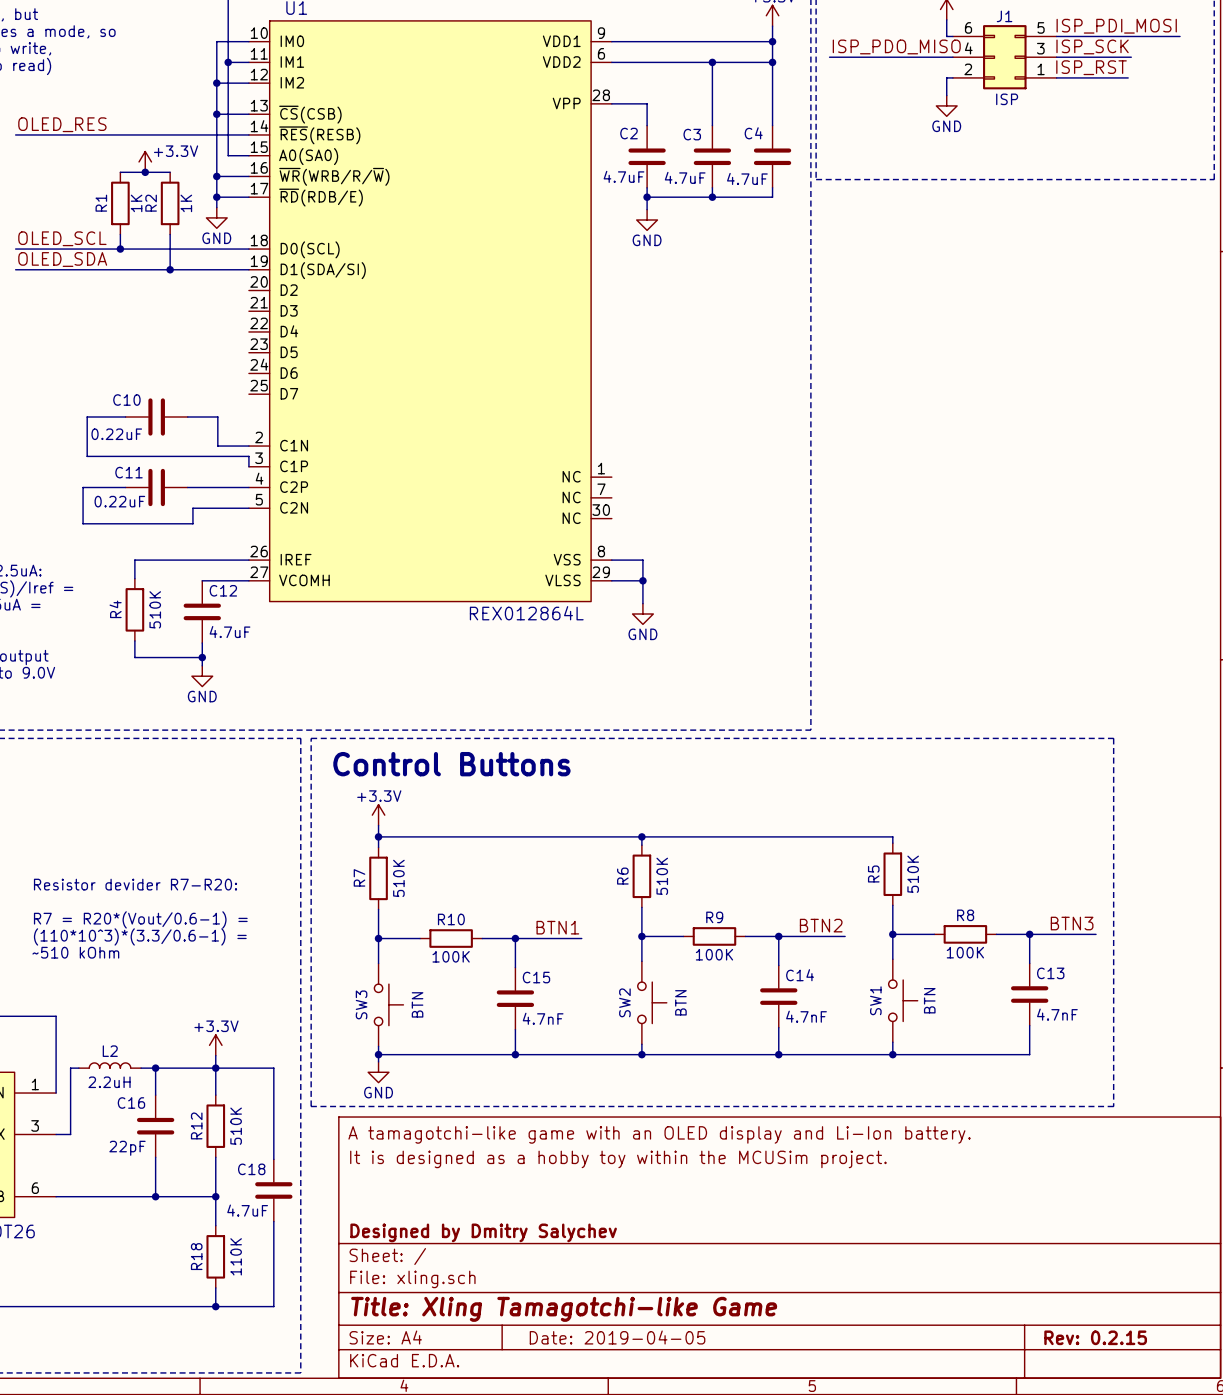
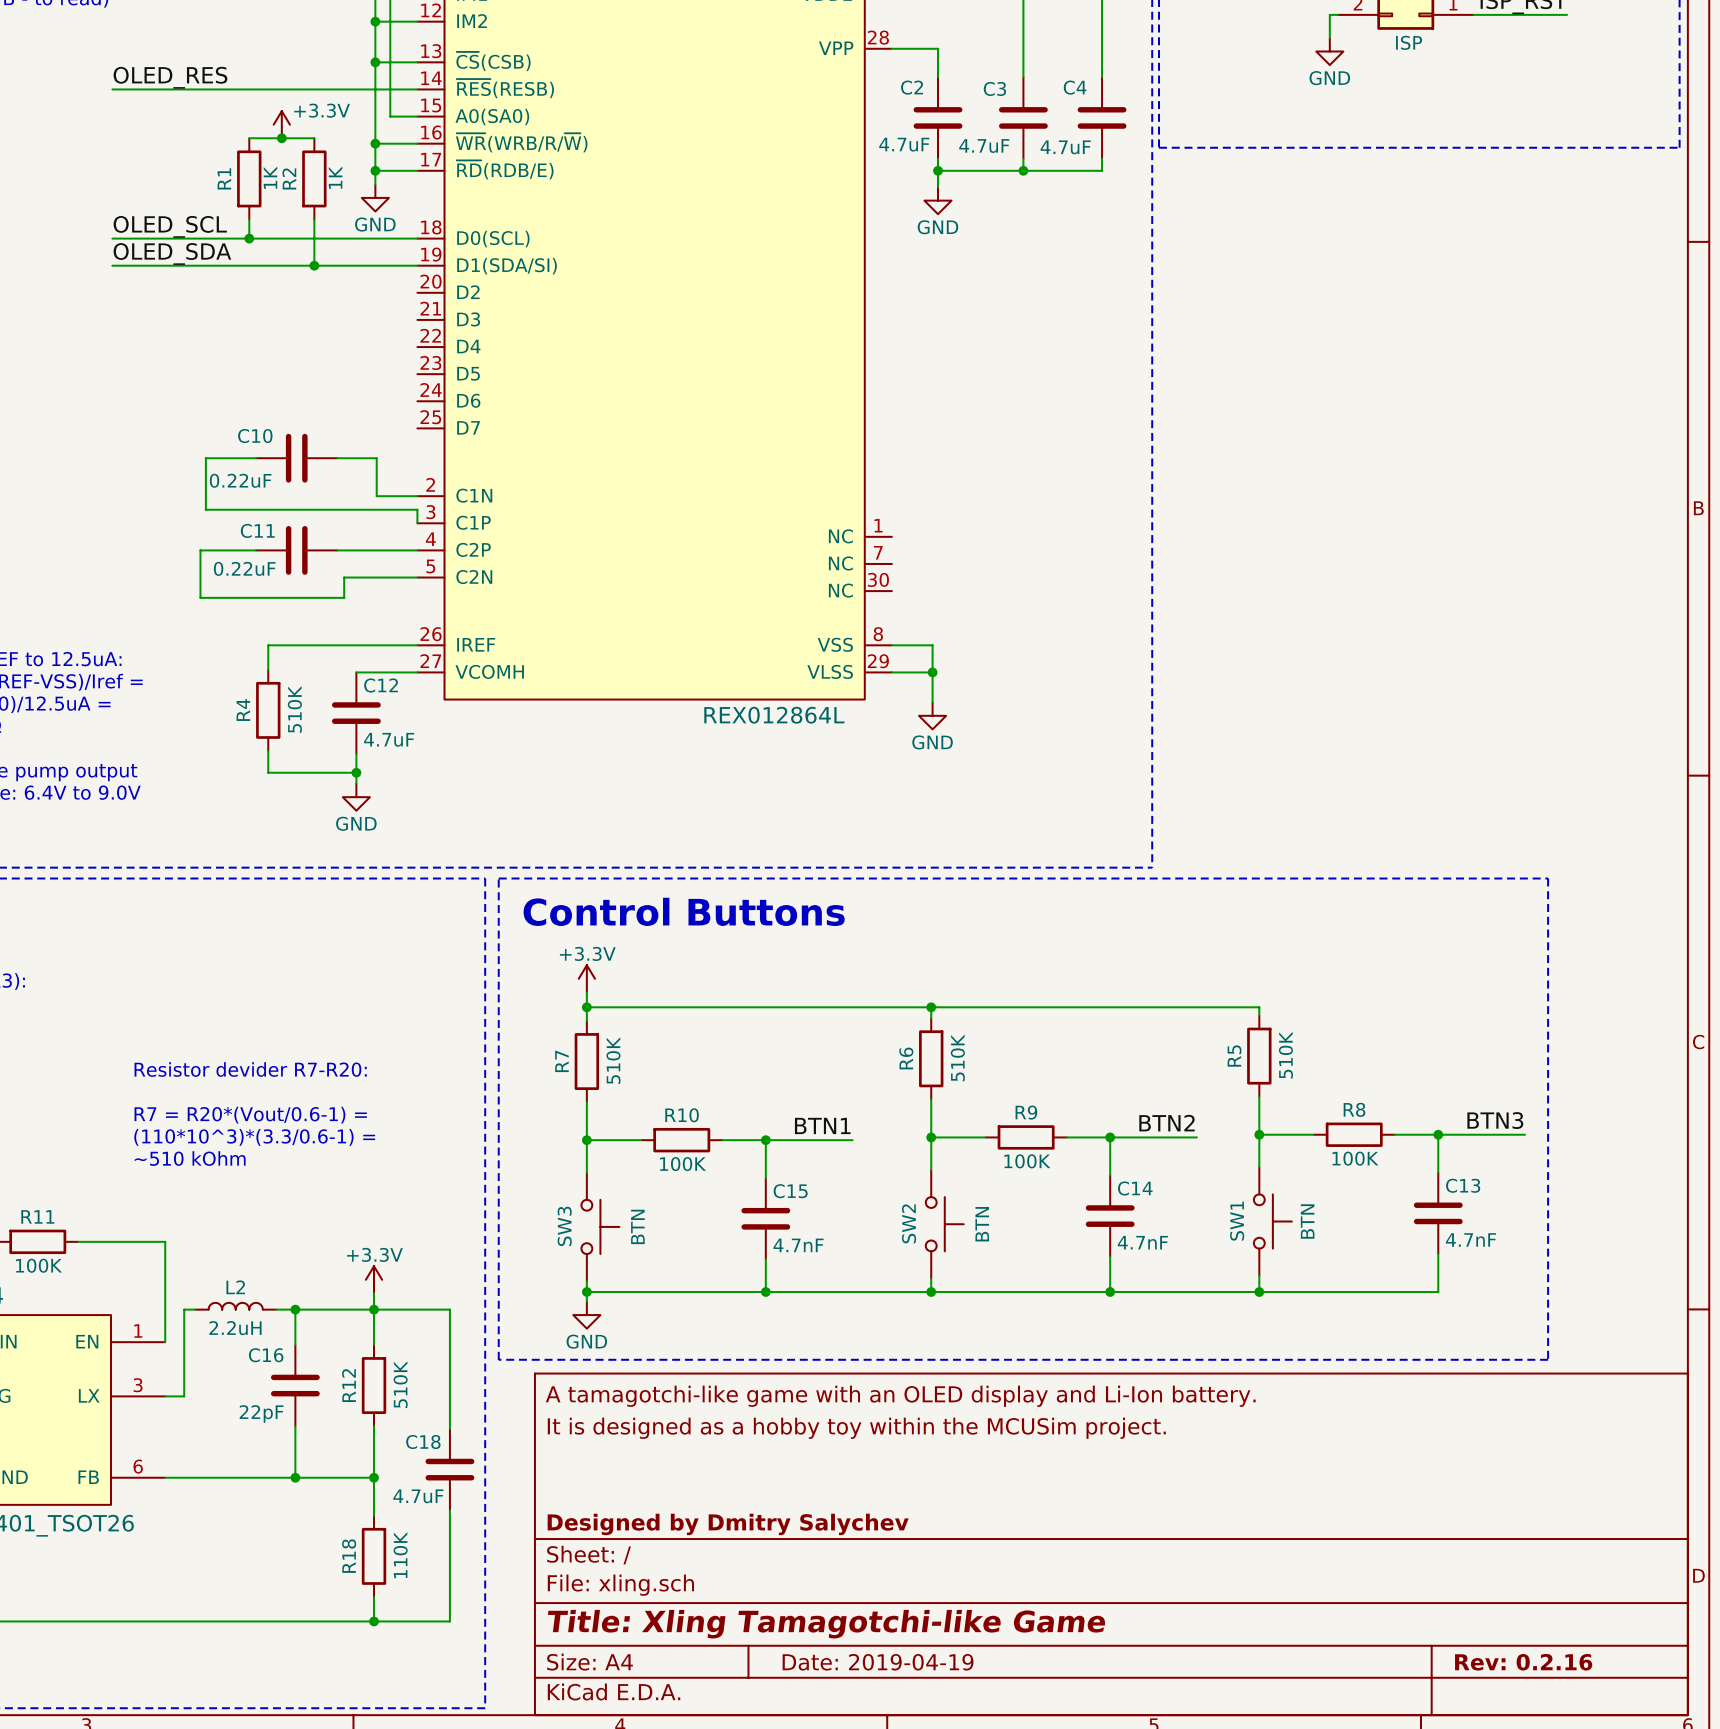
title block: Date: 2019-04-05 (617, 1337) -> Date: 2019-04-19 (878, 1662)
title block: Rev: 0.2.15 (1095, 1337) -> Rev: 0.2.16 (1523, 1662)

